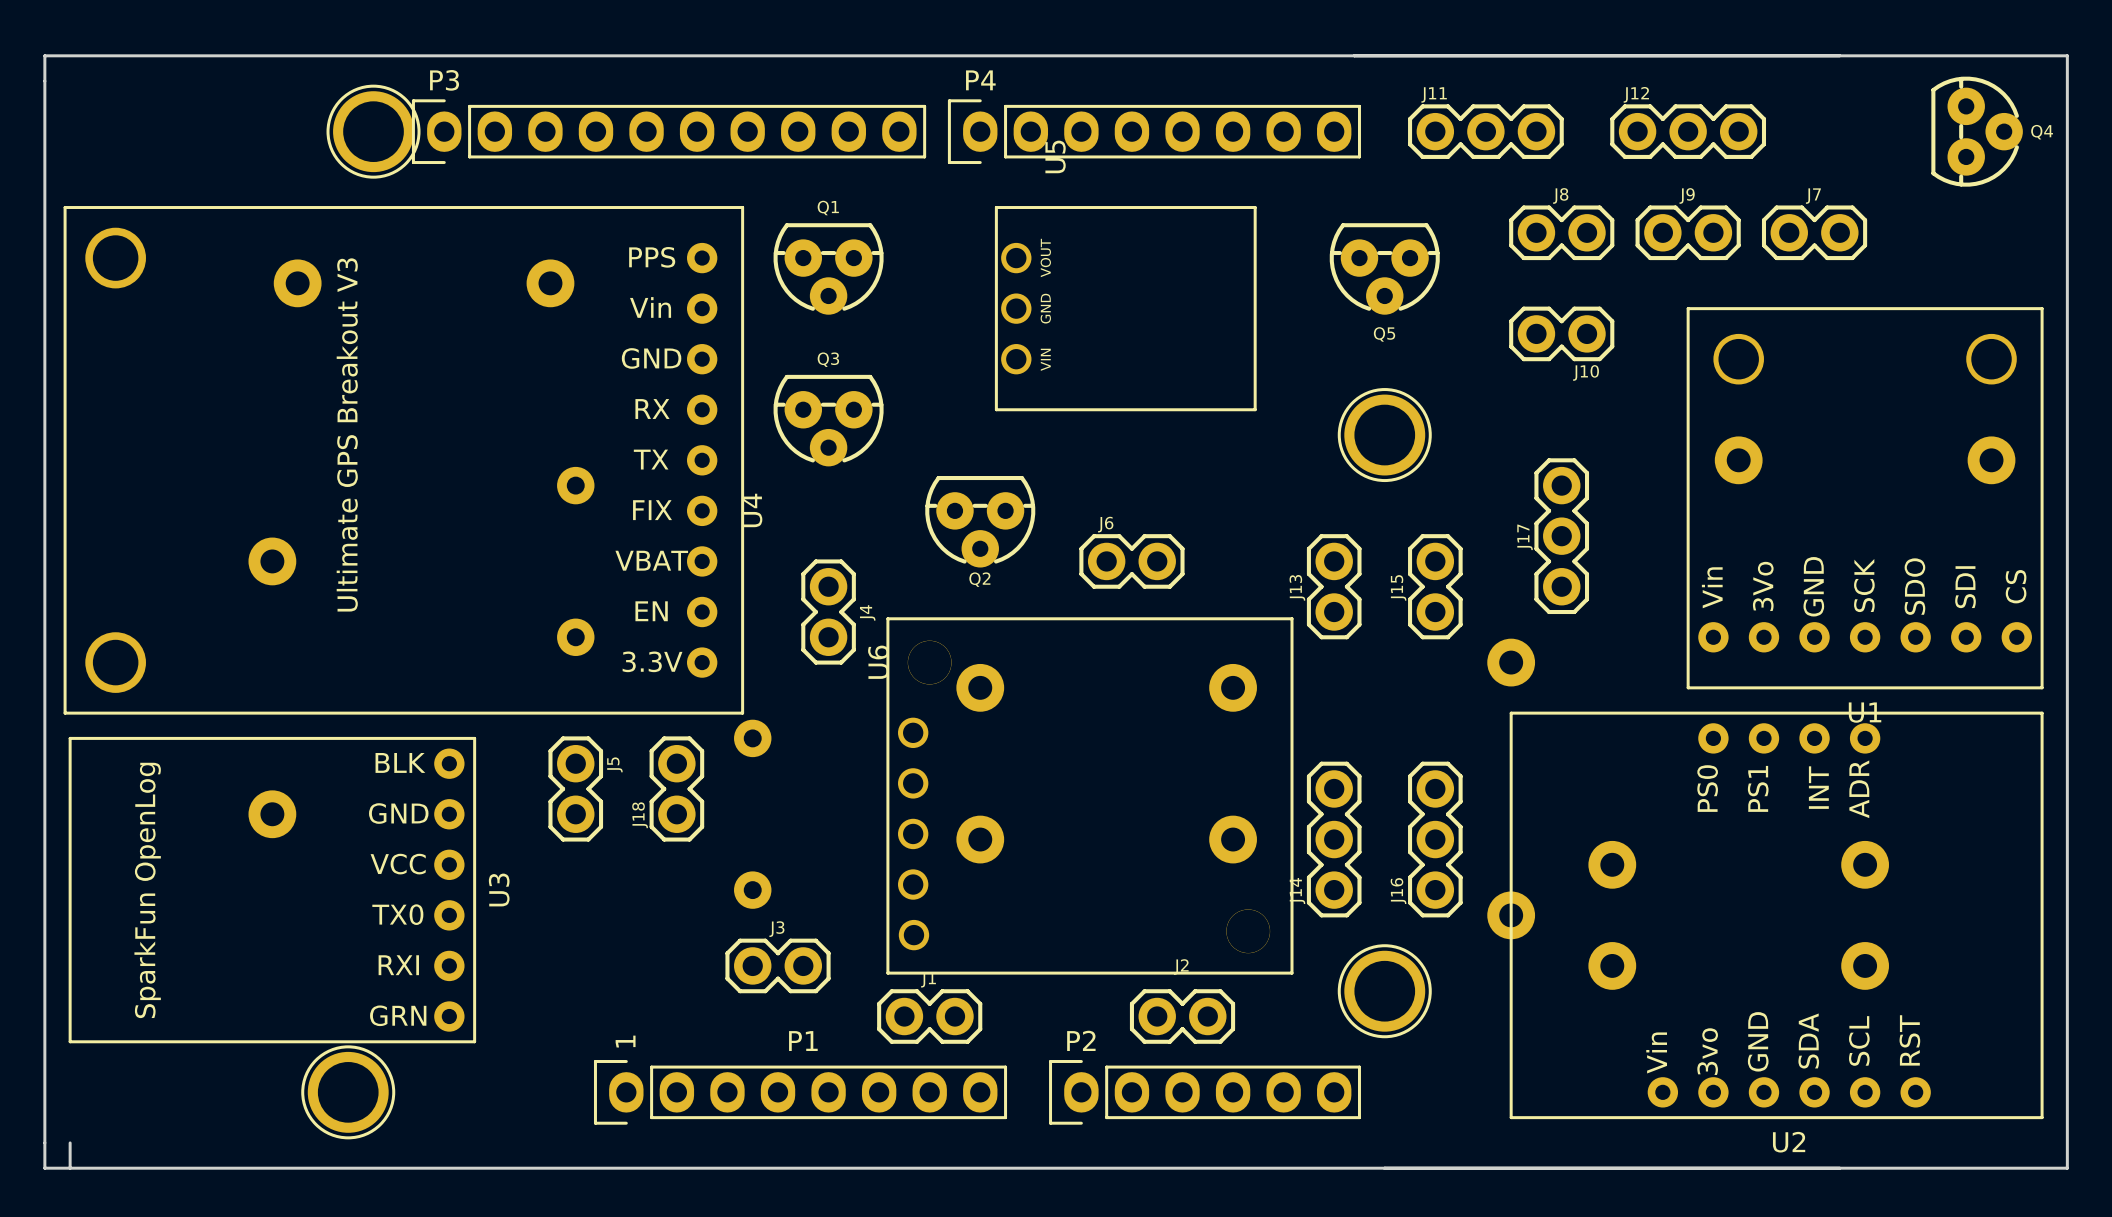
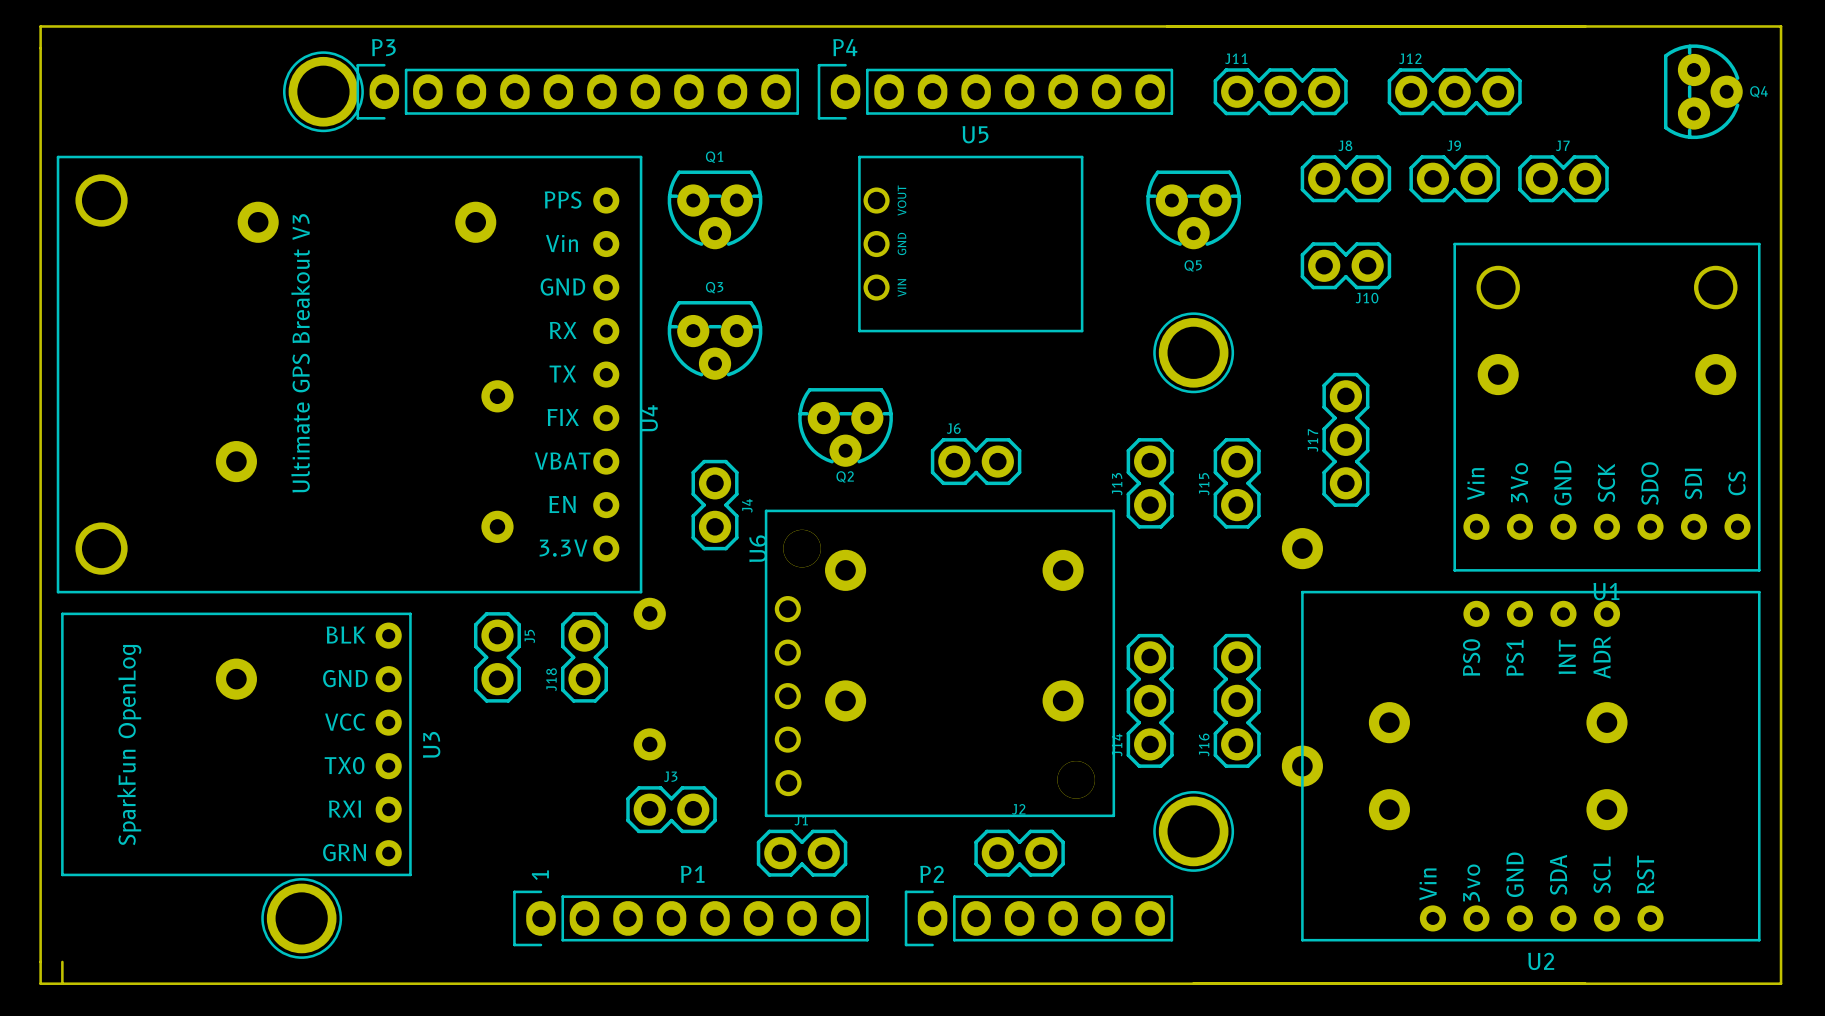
U5 name rotation: 0° (1055, 156) -> 90° clockwise (975, 134)
U5 name position: U5 (1055, 156) -> U5 (975, 134)

